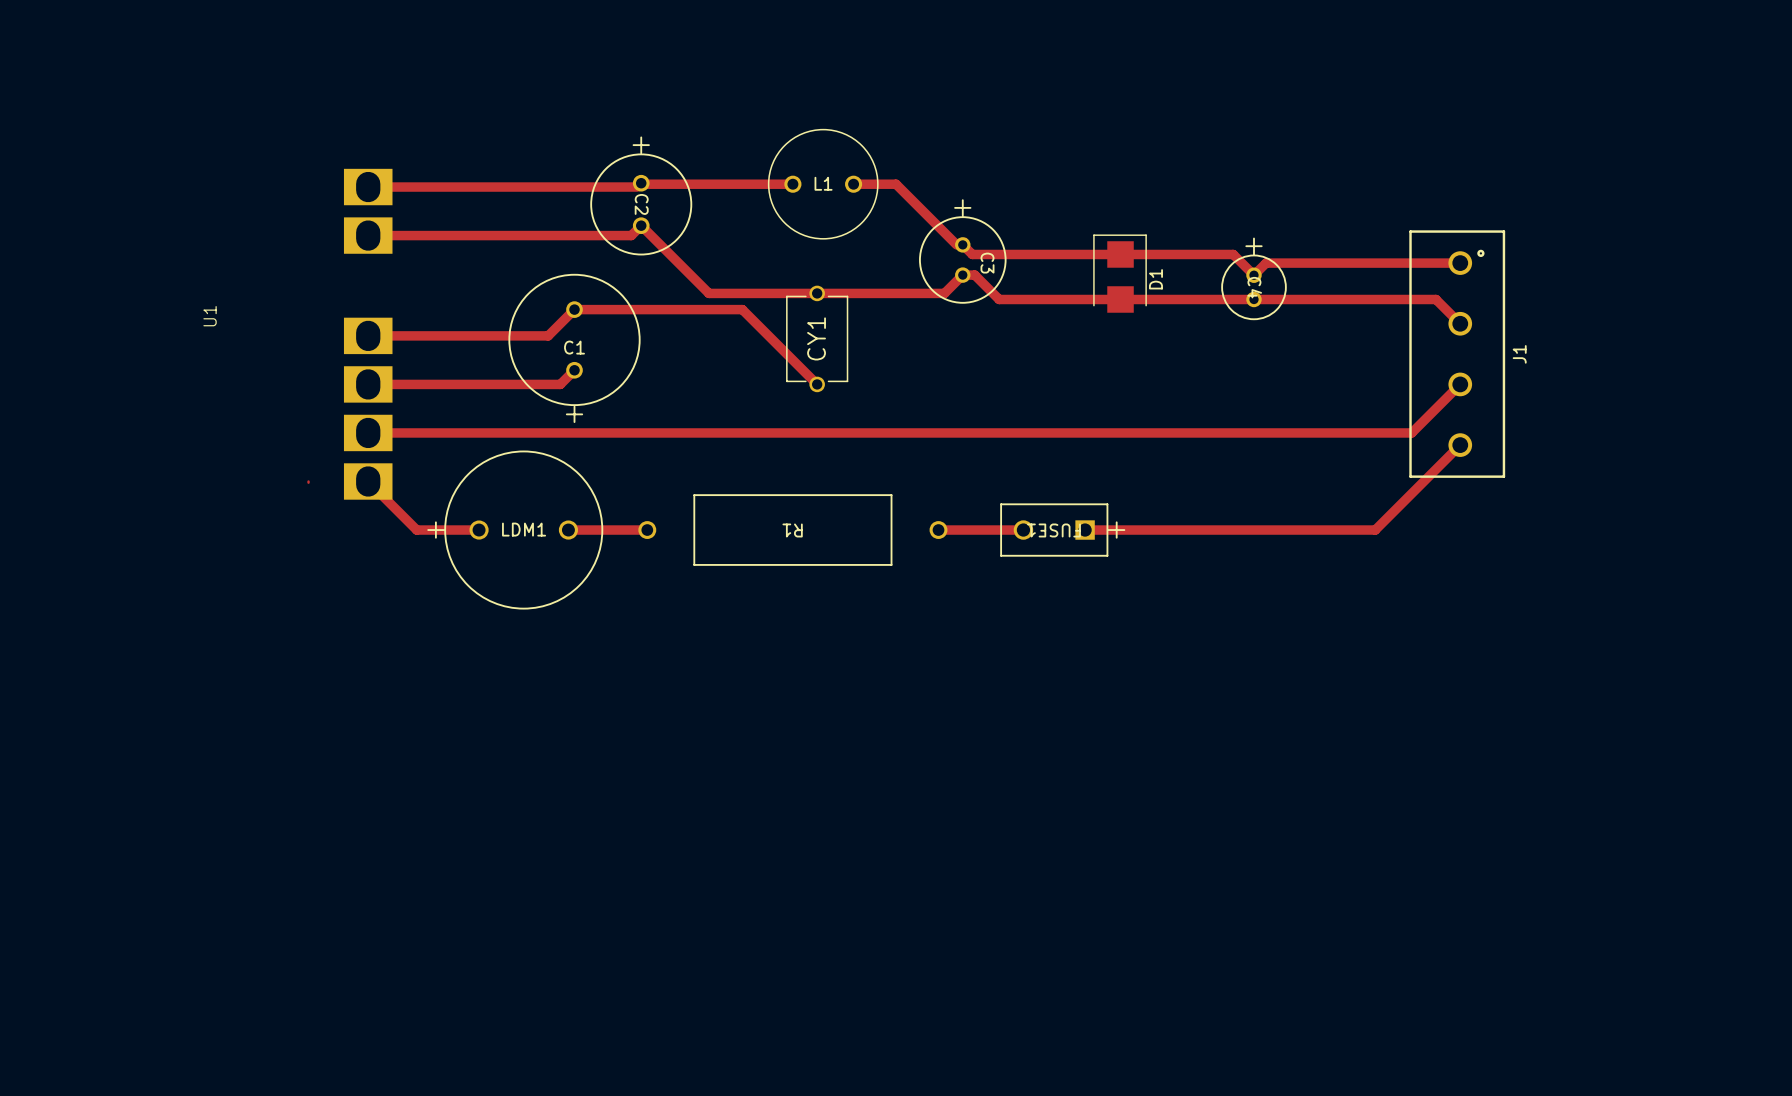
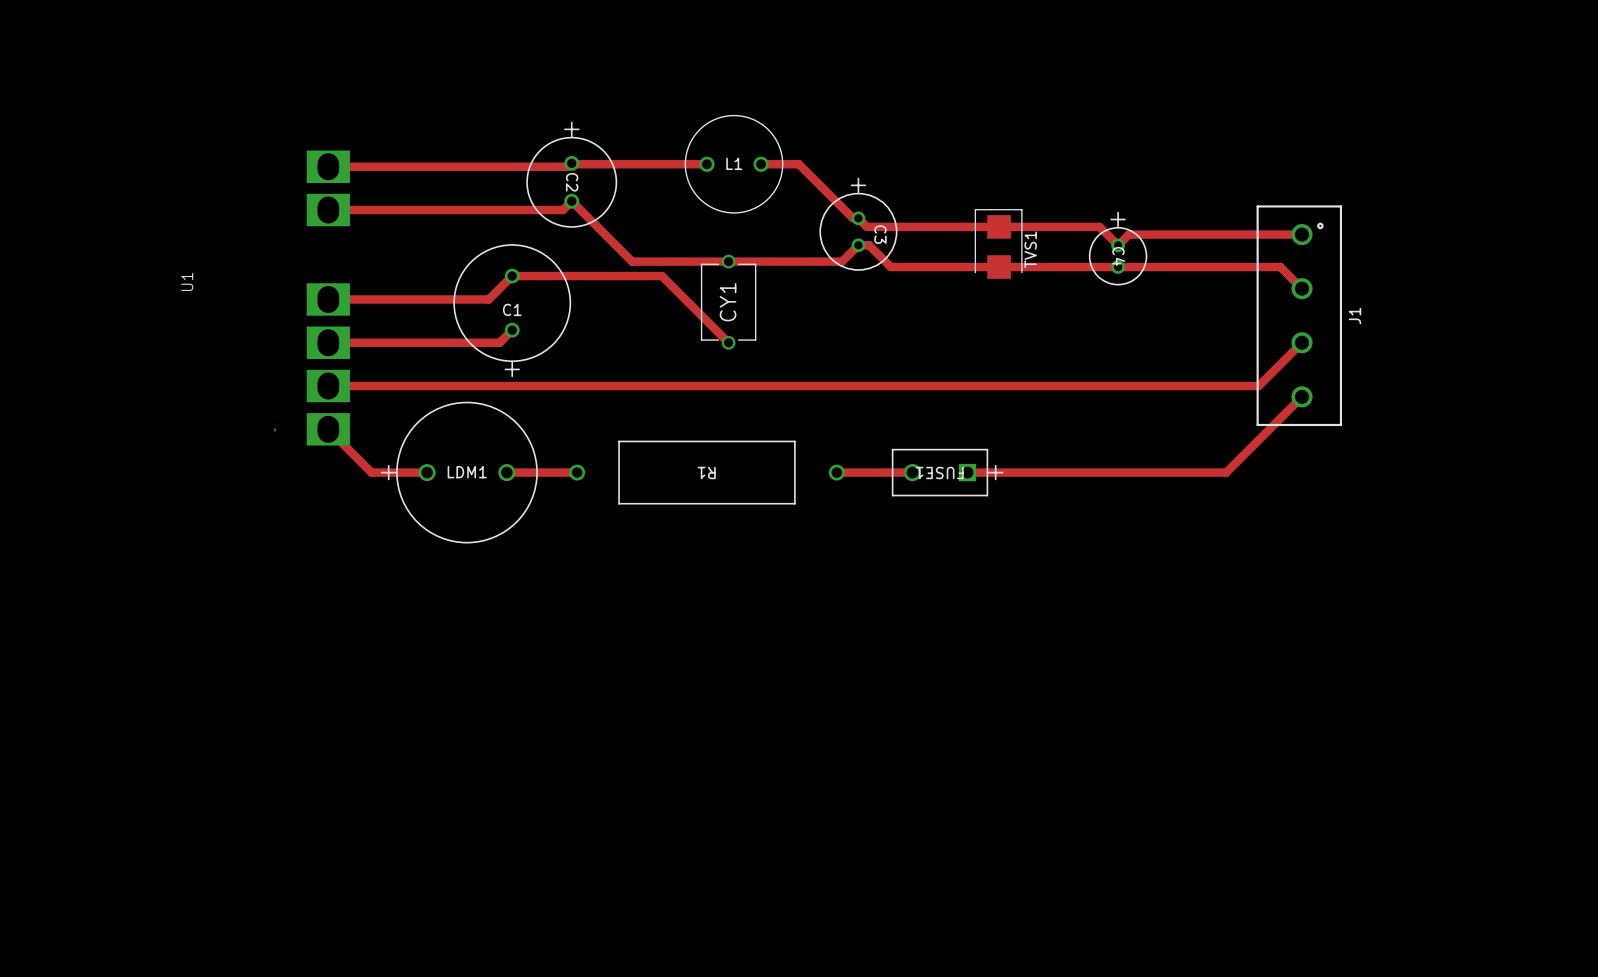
D1 name: D1 (1155, 279) -> TVS1 (1030, 249)

